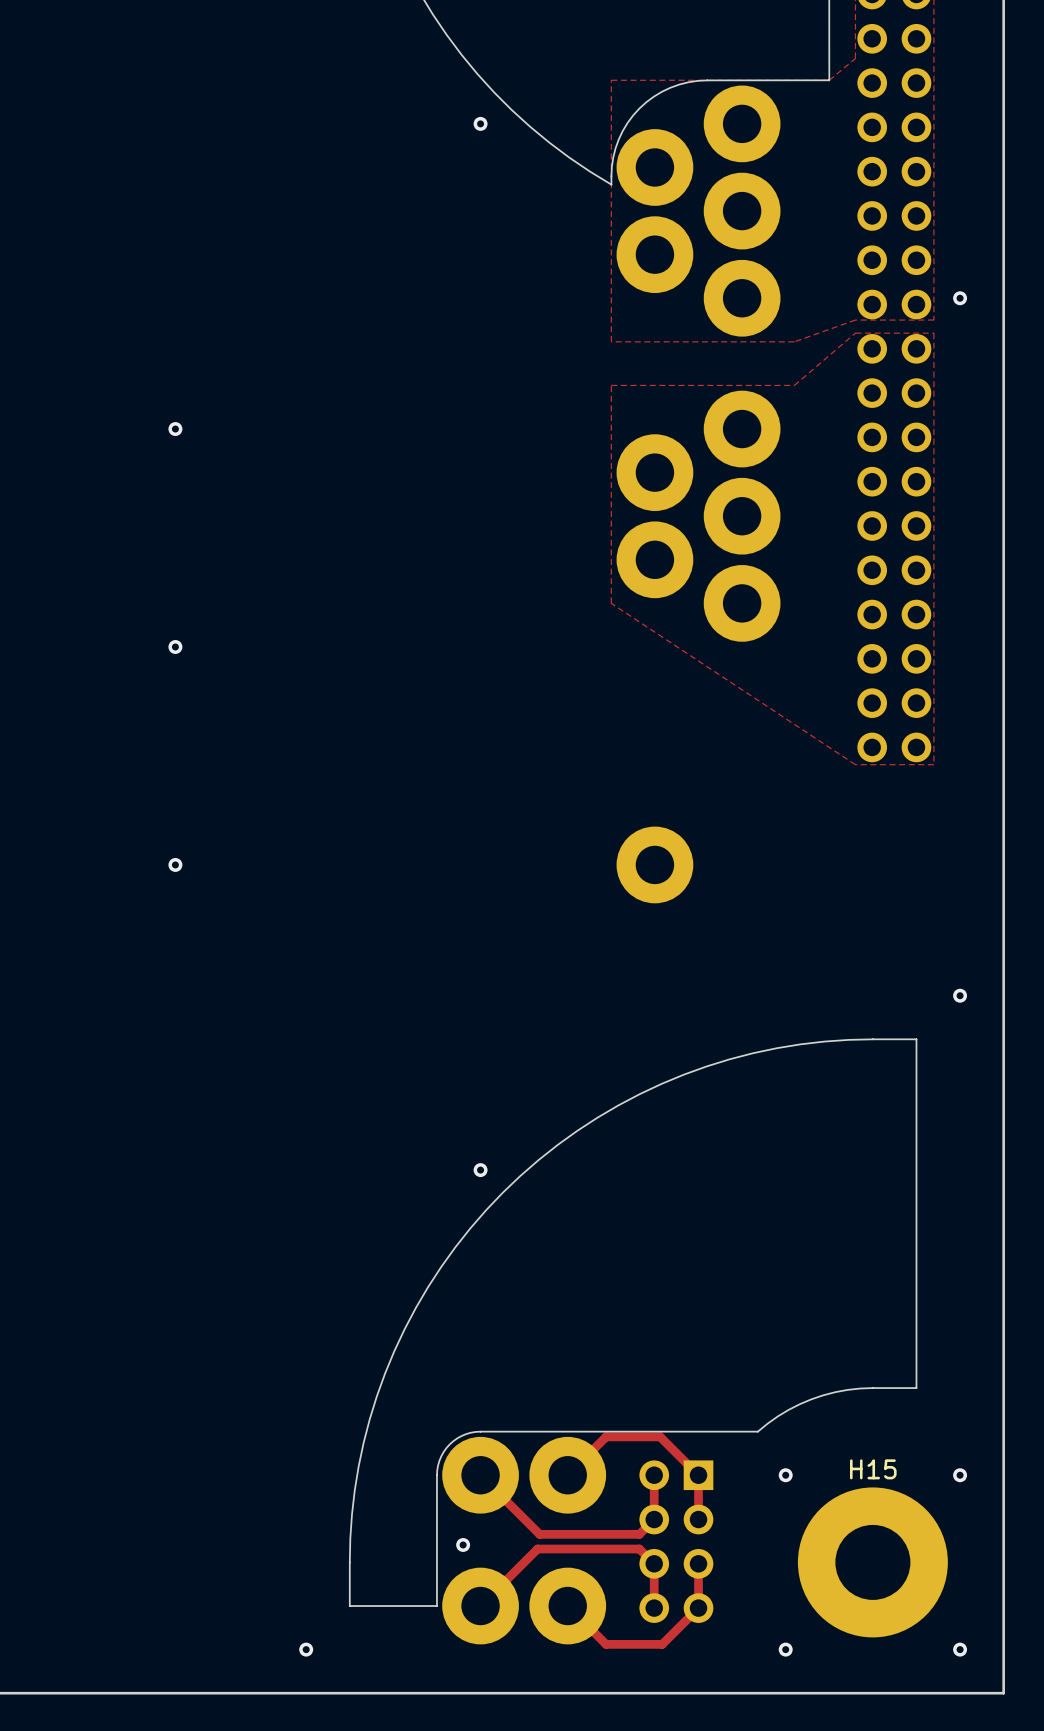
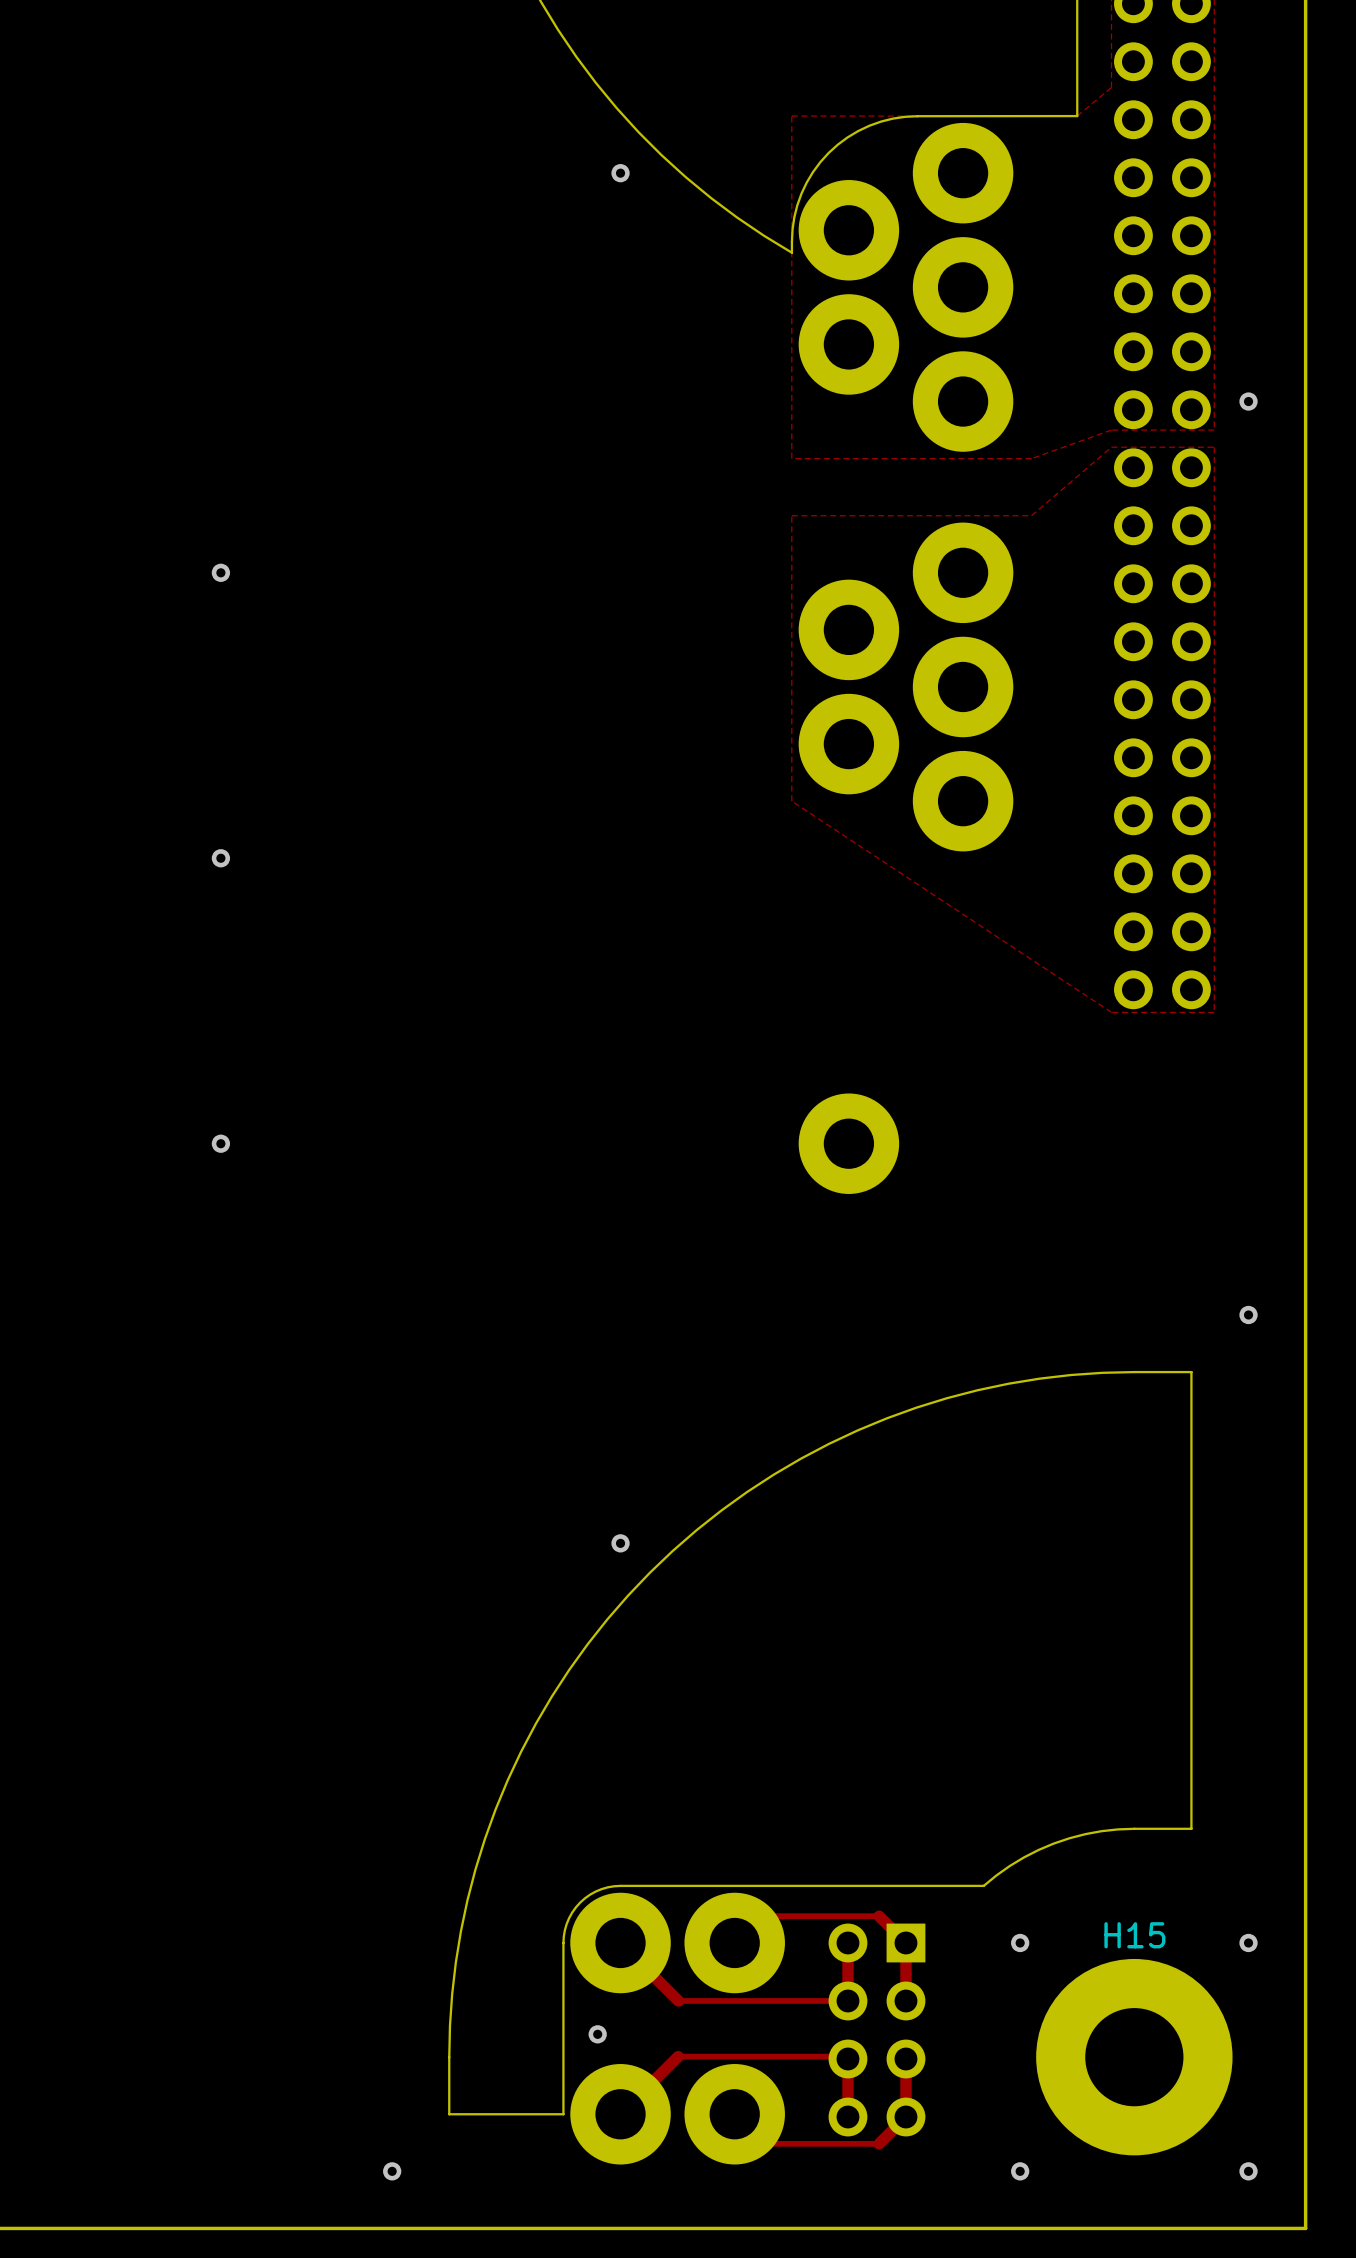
track: (588, 1454) (606, 1436) (660, 1436) (678, 1454) -> (761, 1916) (879, 1916)
track: (524, 1519) (539, 1534) (639, 1534) (654, 1519) -> (678, 2000) (847, 2000)
track: (524, 1561) (537, 1548) (639, 1548) (652, 1561) -> (678, 2056) (845, 2056)
track: (590, 1628) (606, 1644) (662, 1644) (678, 1628) -> (764, 2143) (879, 2143)

